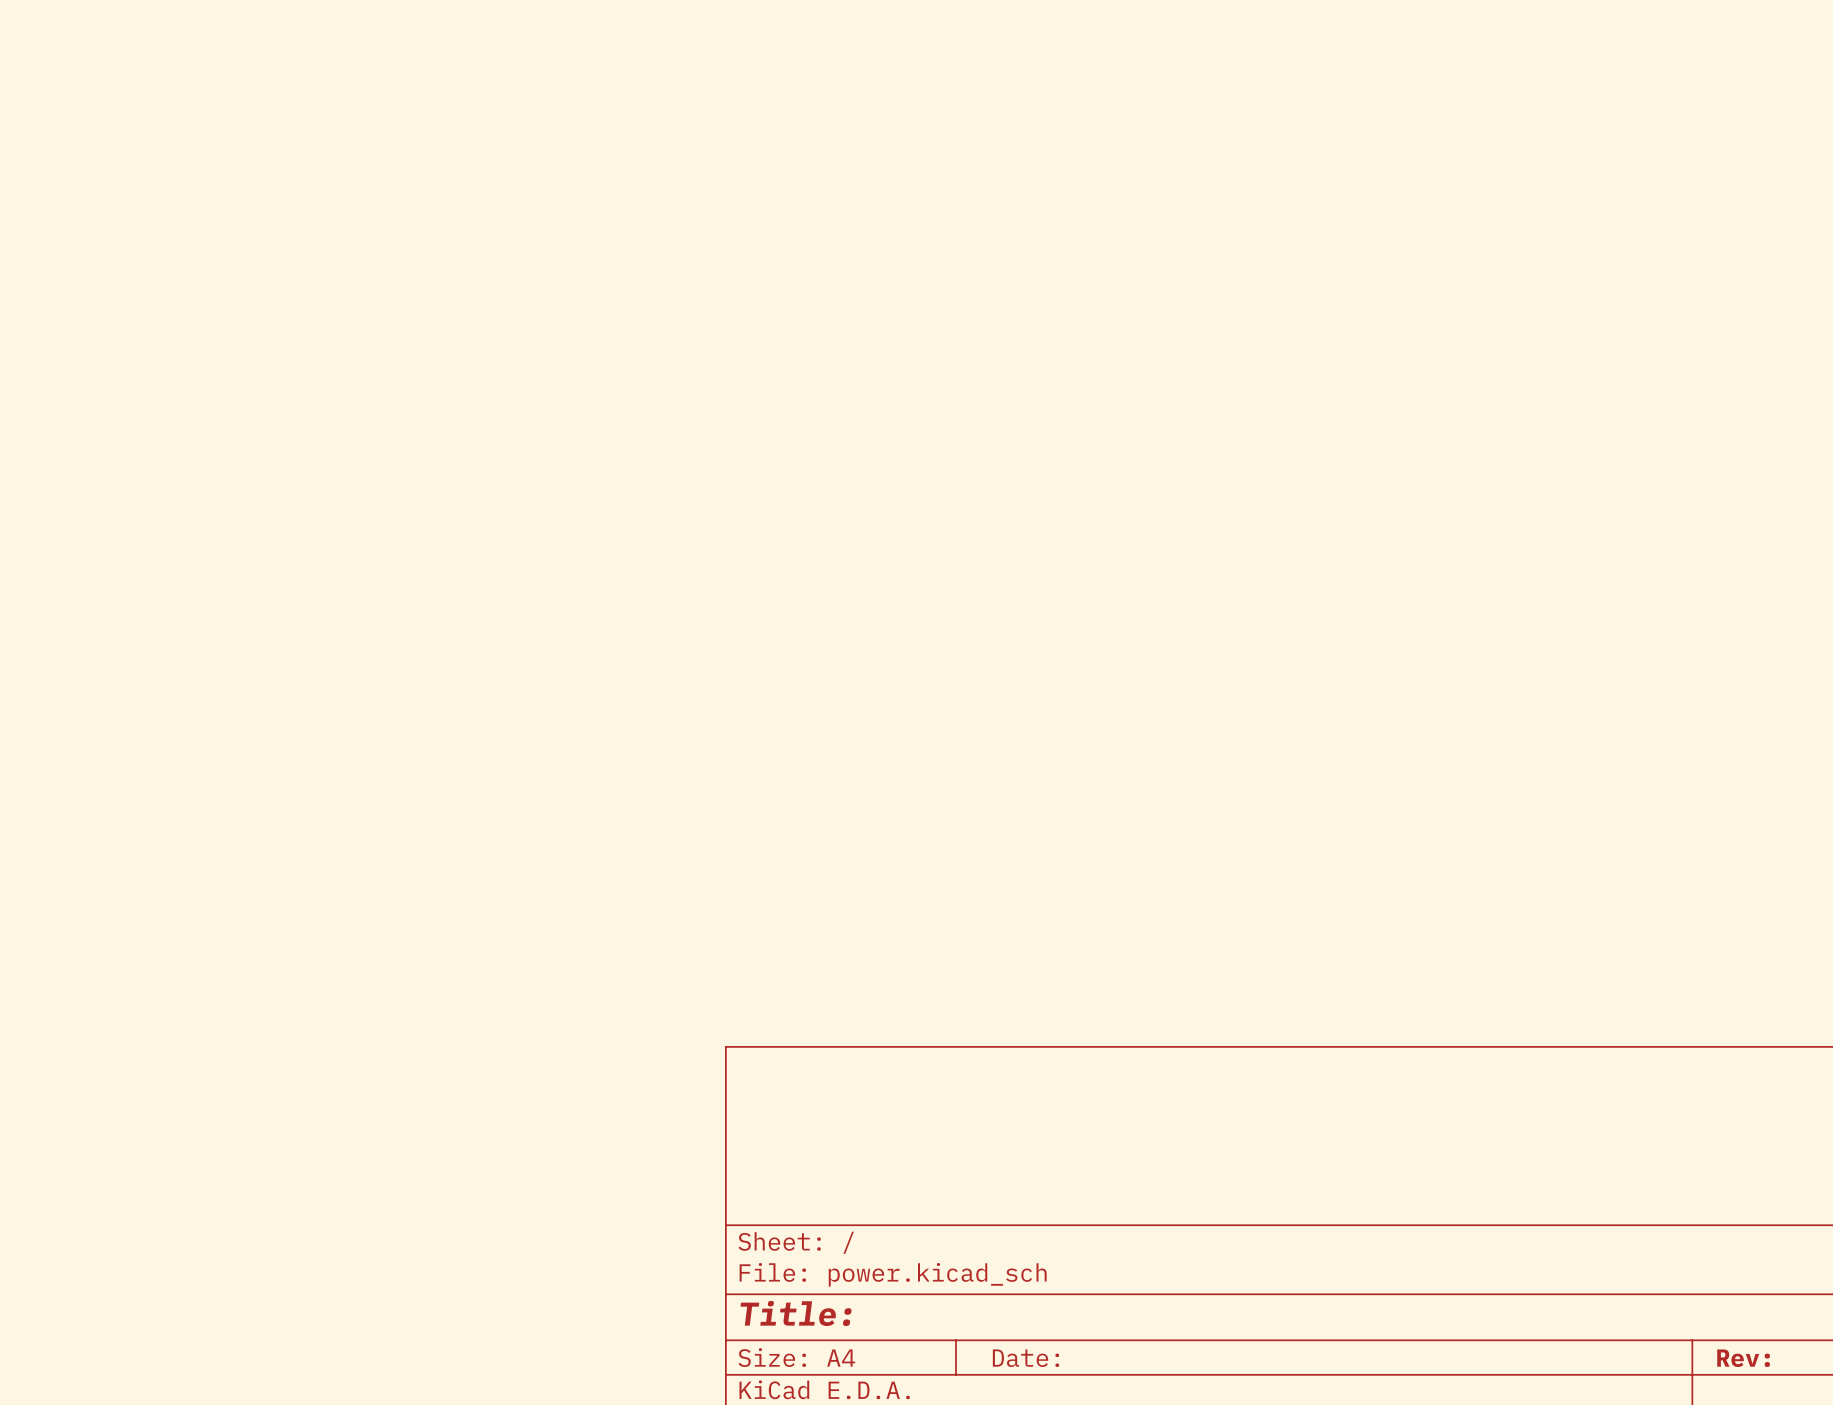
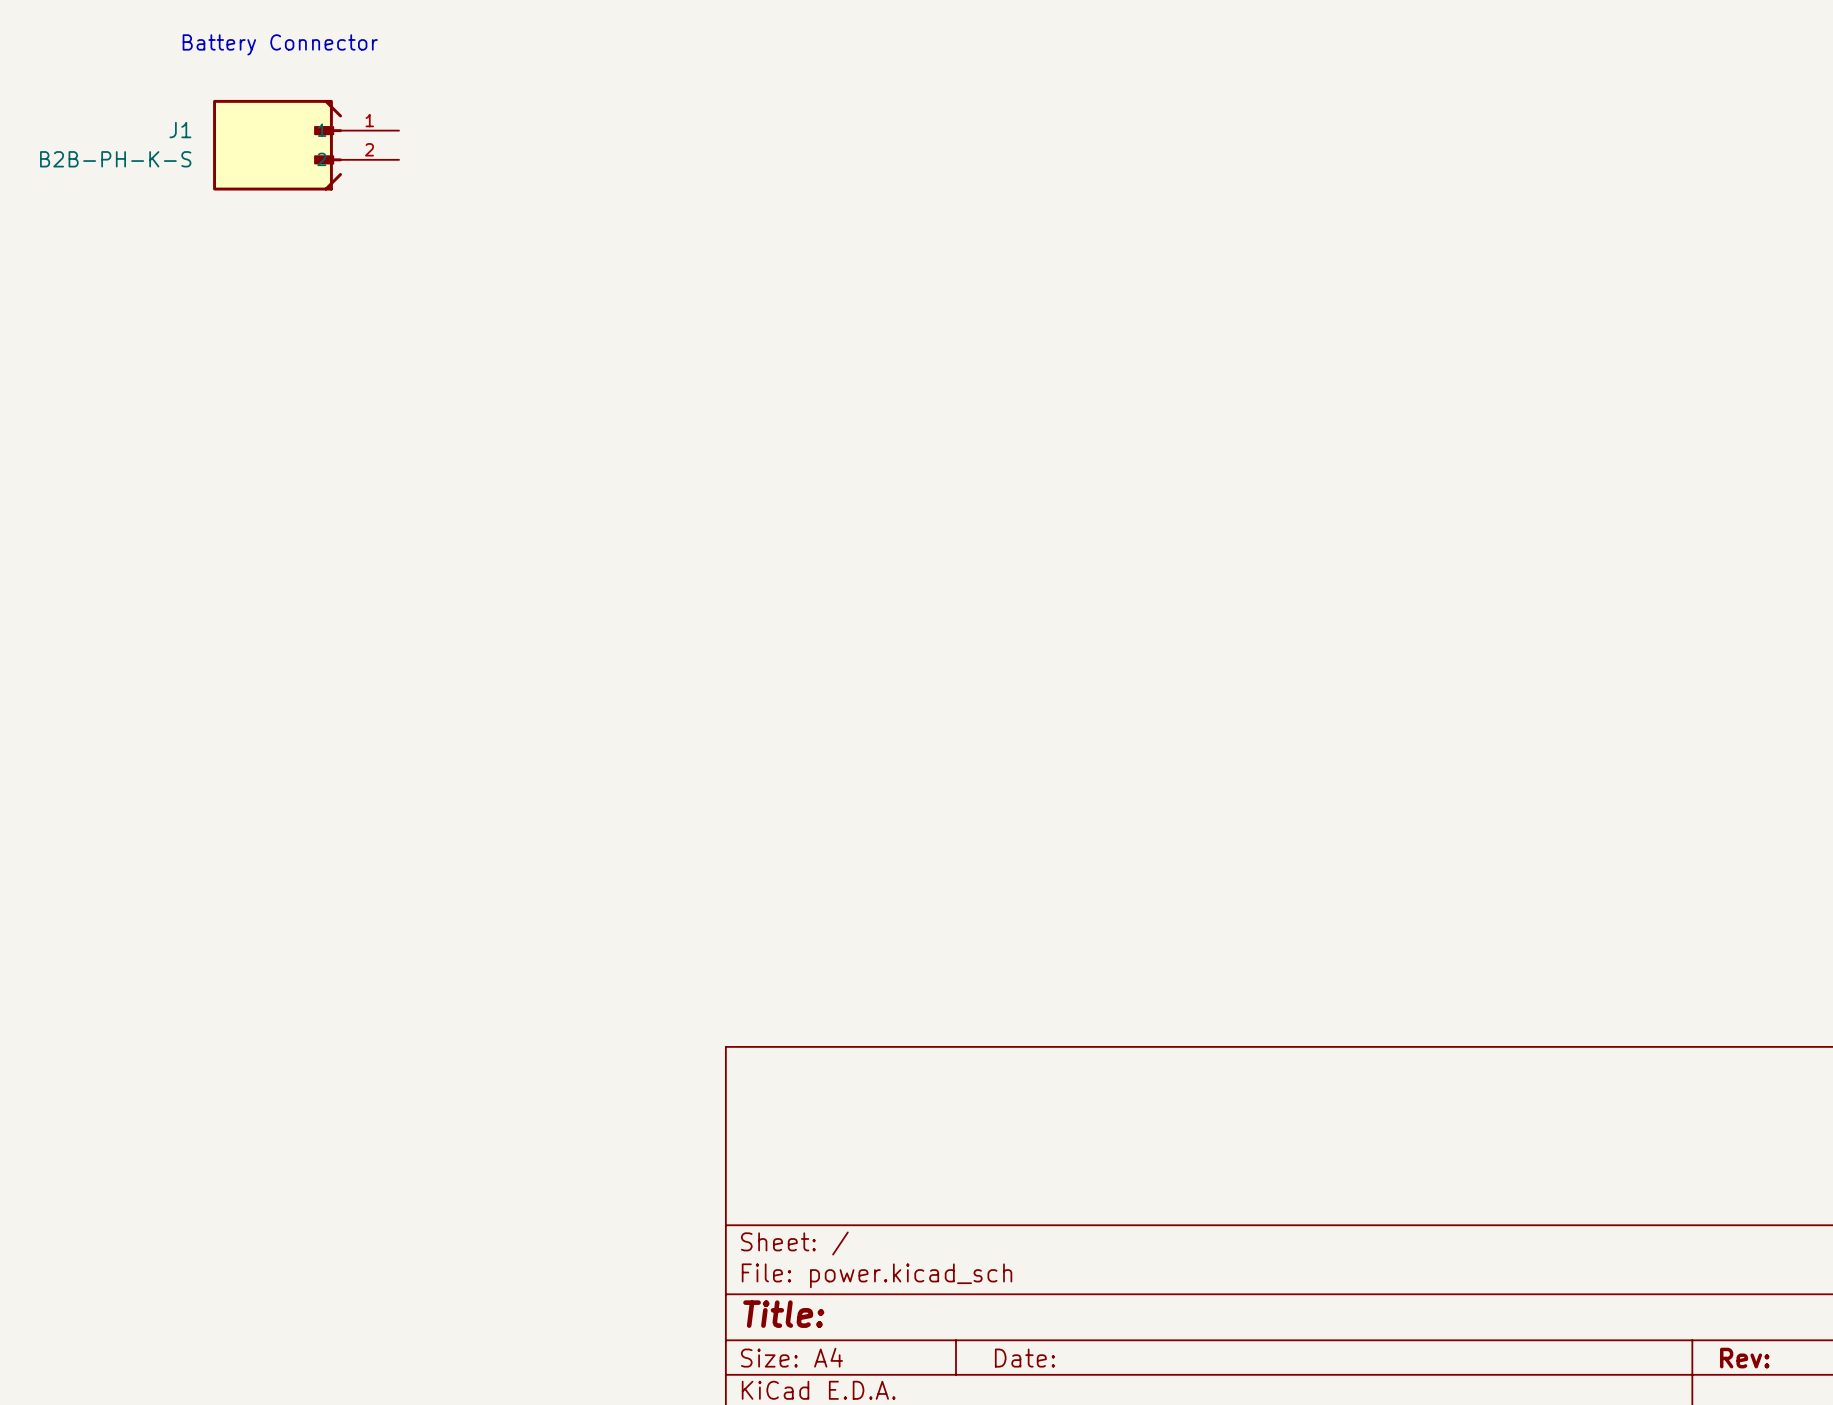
text: none -> Battery Connector (280, 44)
J1: none -> B2B-PH-K-S (306, 145)

